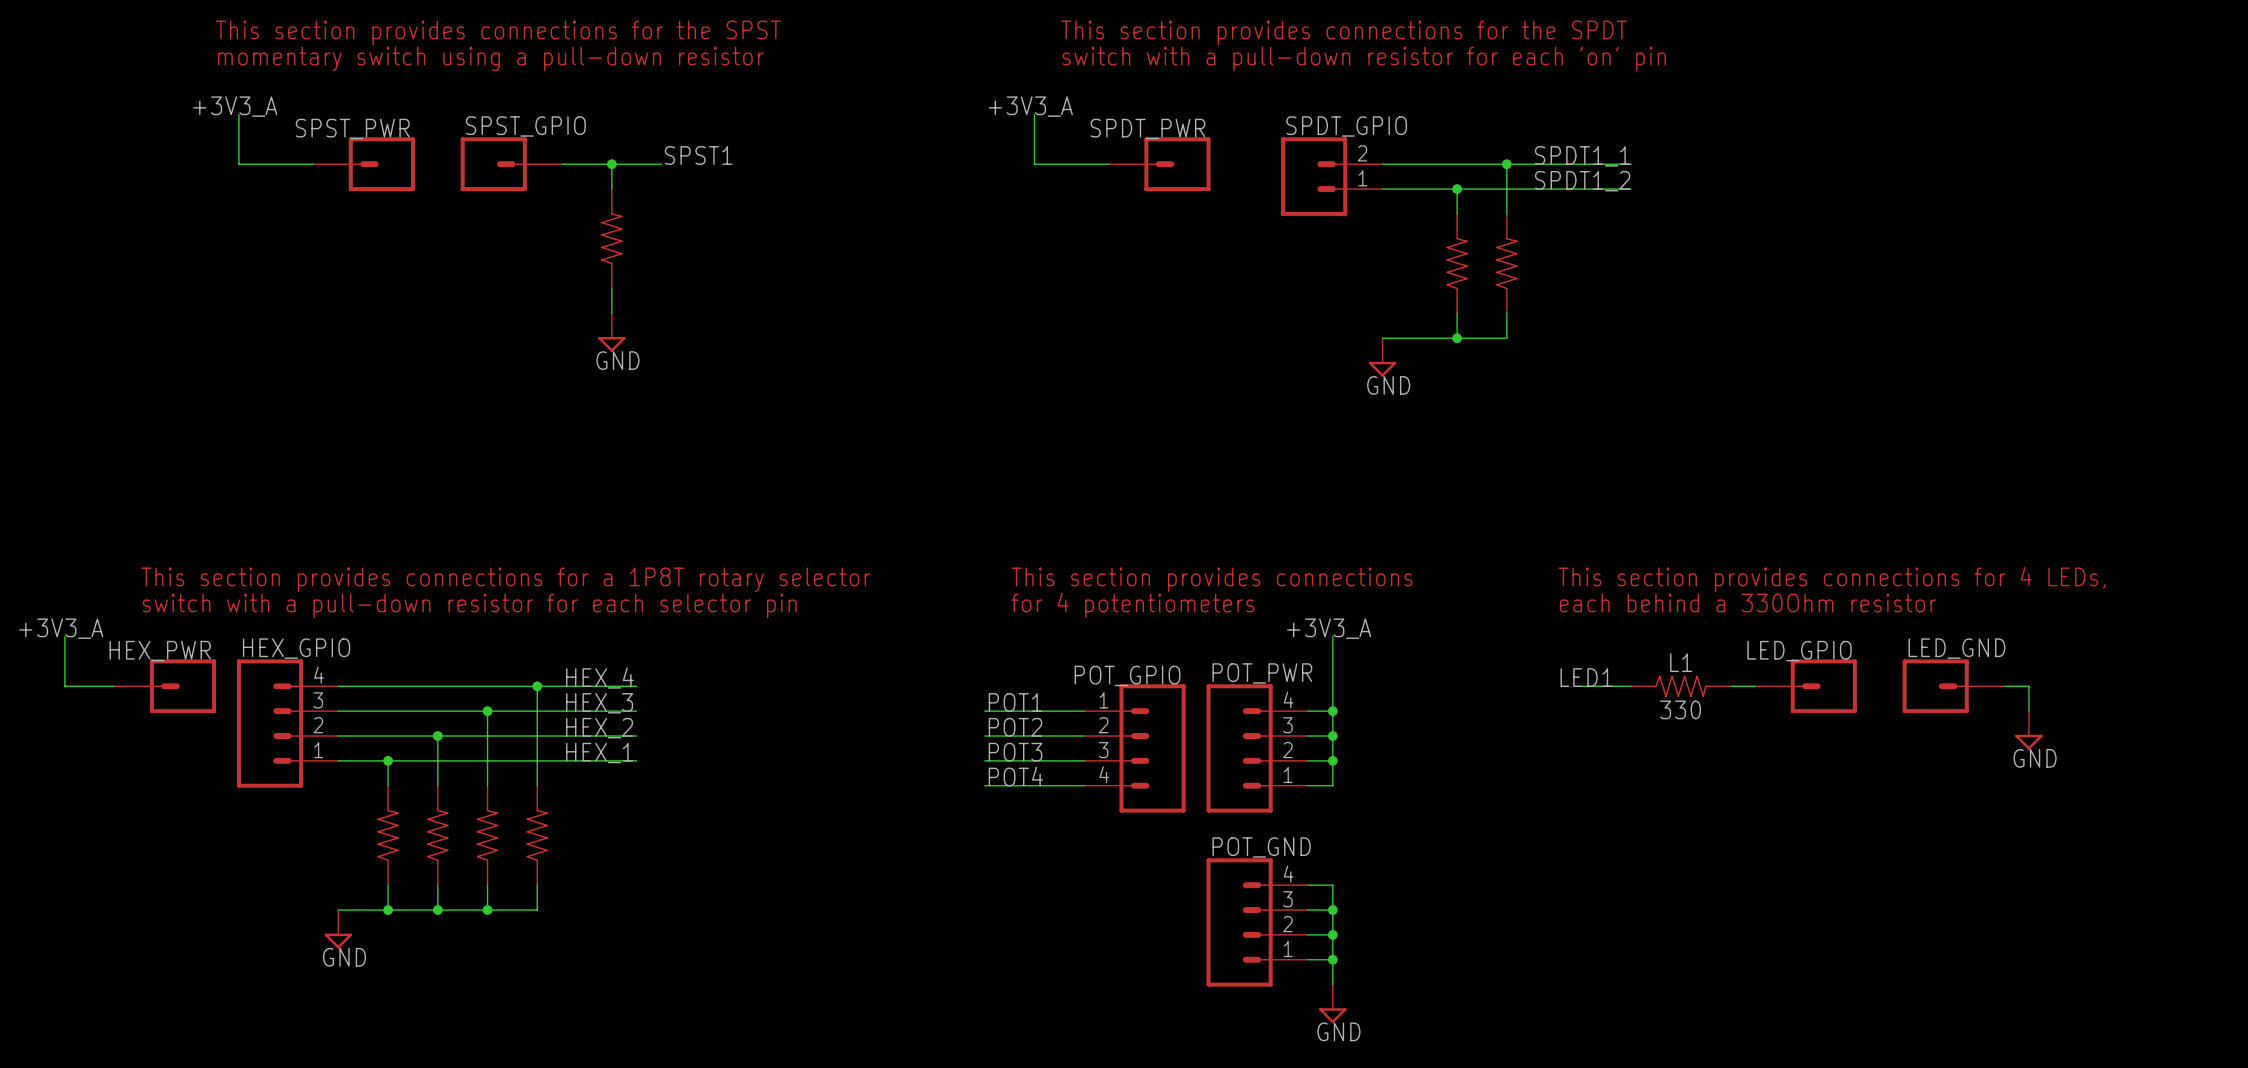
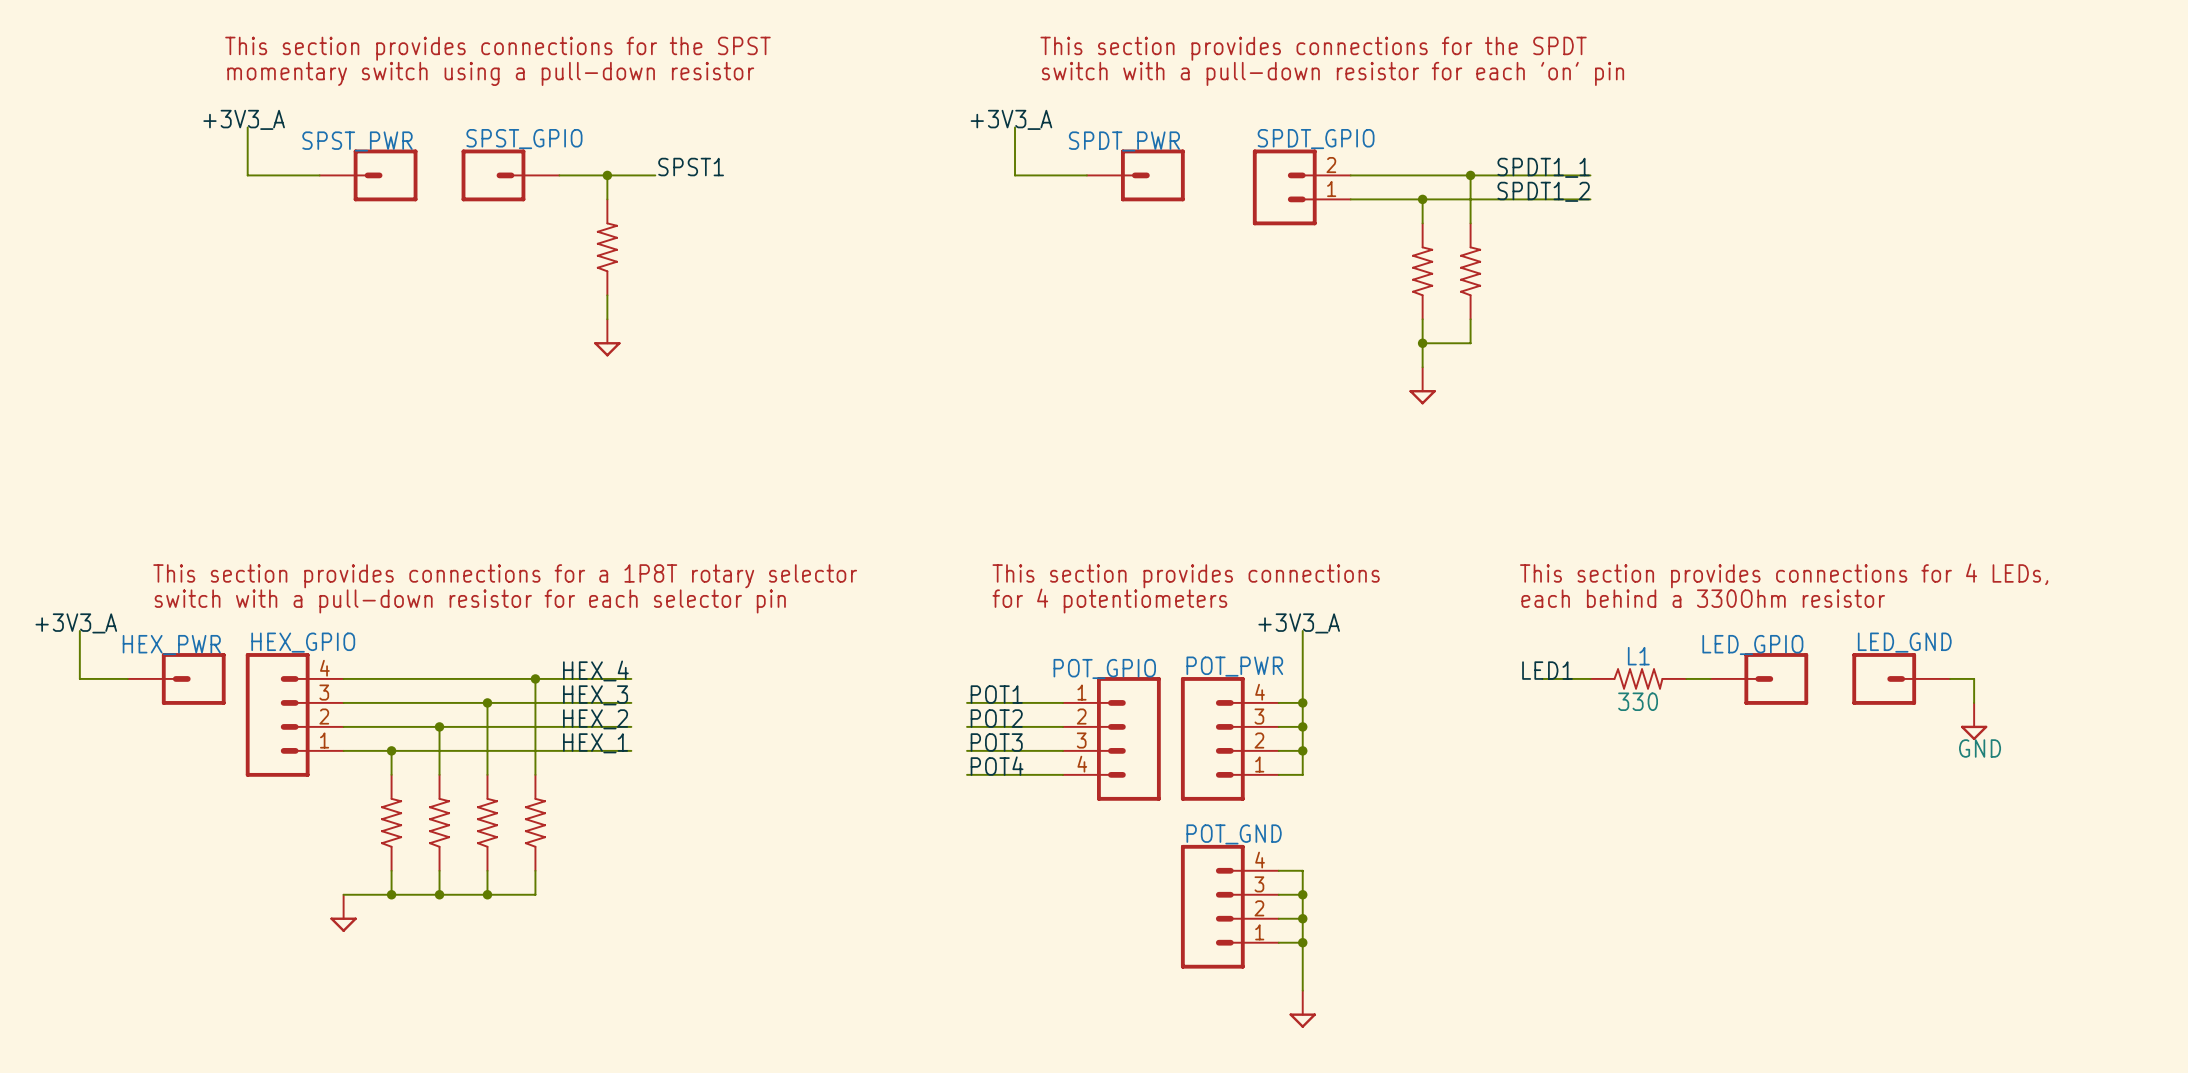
wire: (1382, 338) (1457, 338) -> (1422, 367) (1422, 343)
power symbol: GND (1382, 357) -> none
power symbol text: GND (617, 360) -> none
power symbol: none -> (1422, 385)
power symbol text: GND (344, 957) -> none
power symbol: GND (1332, 1003) -> none
power symbol: none -> (1302, 1009)

